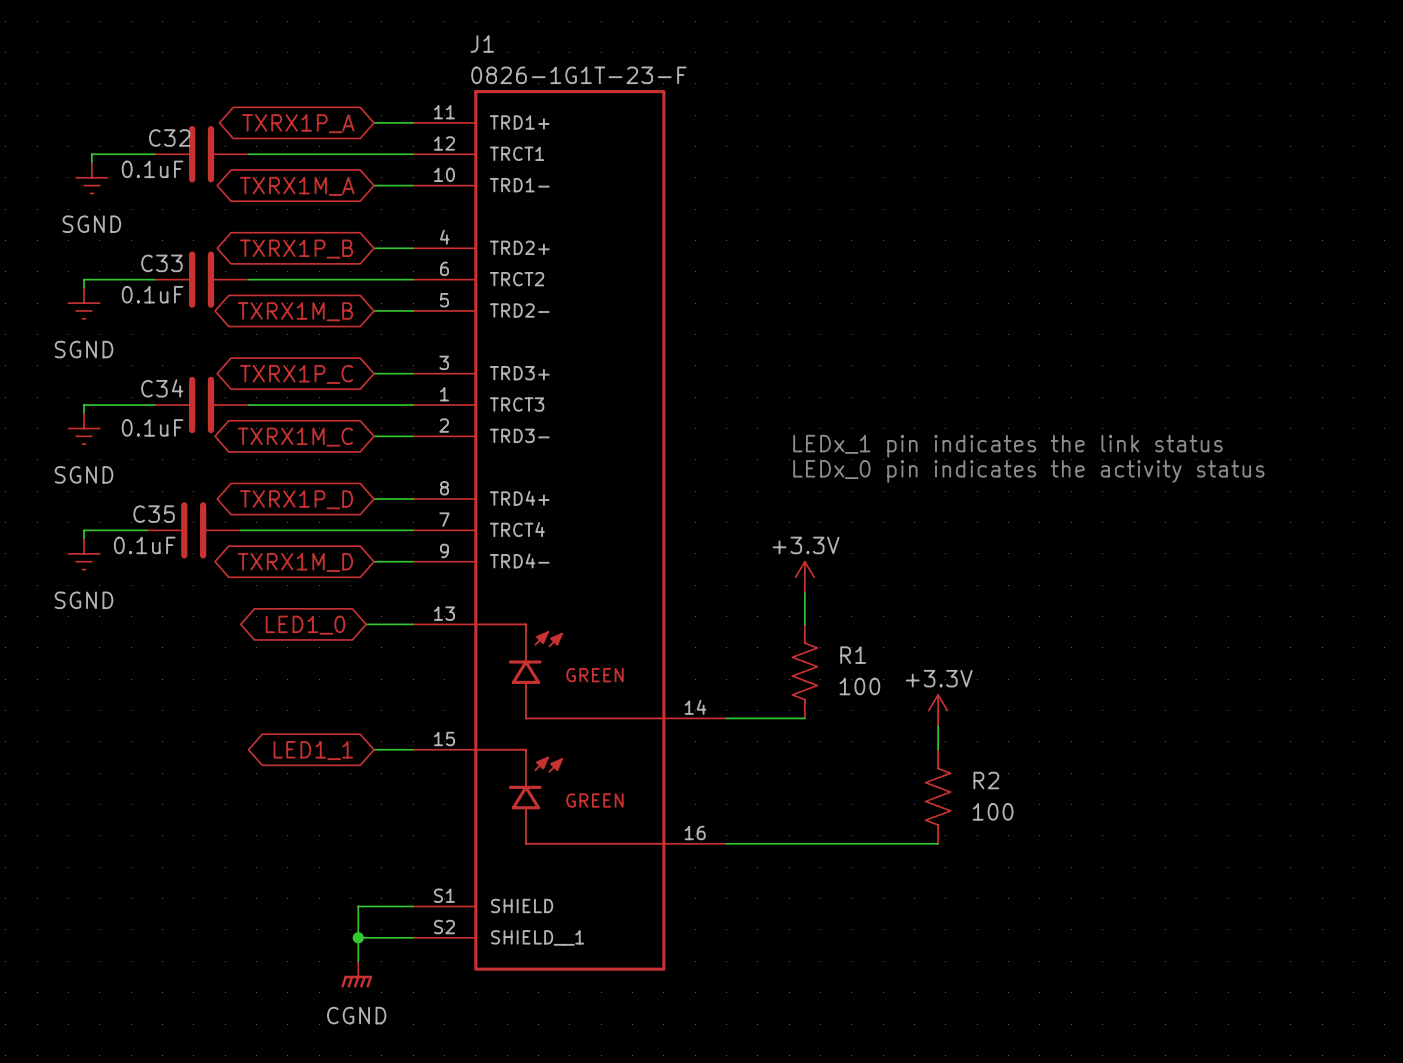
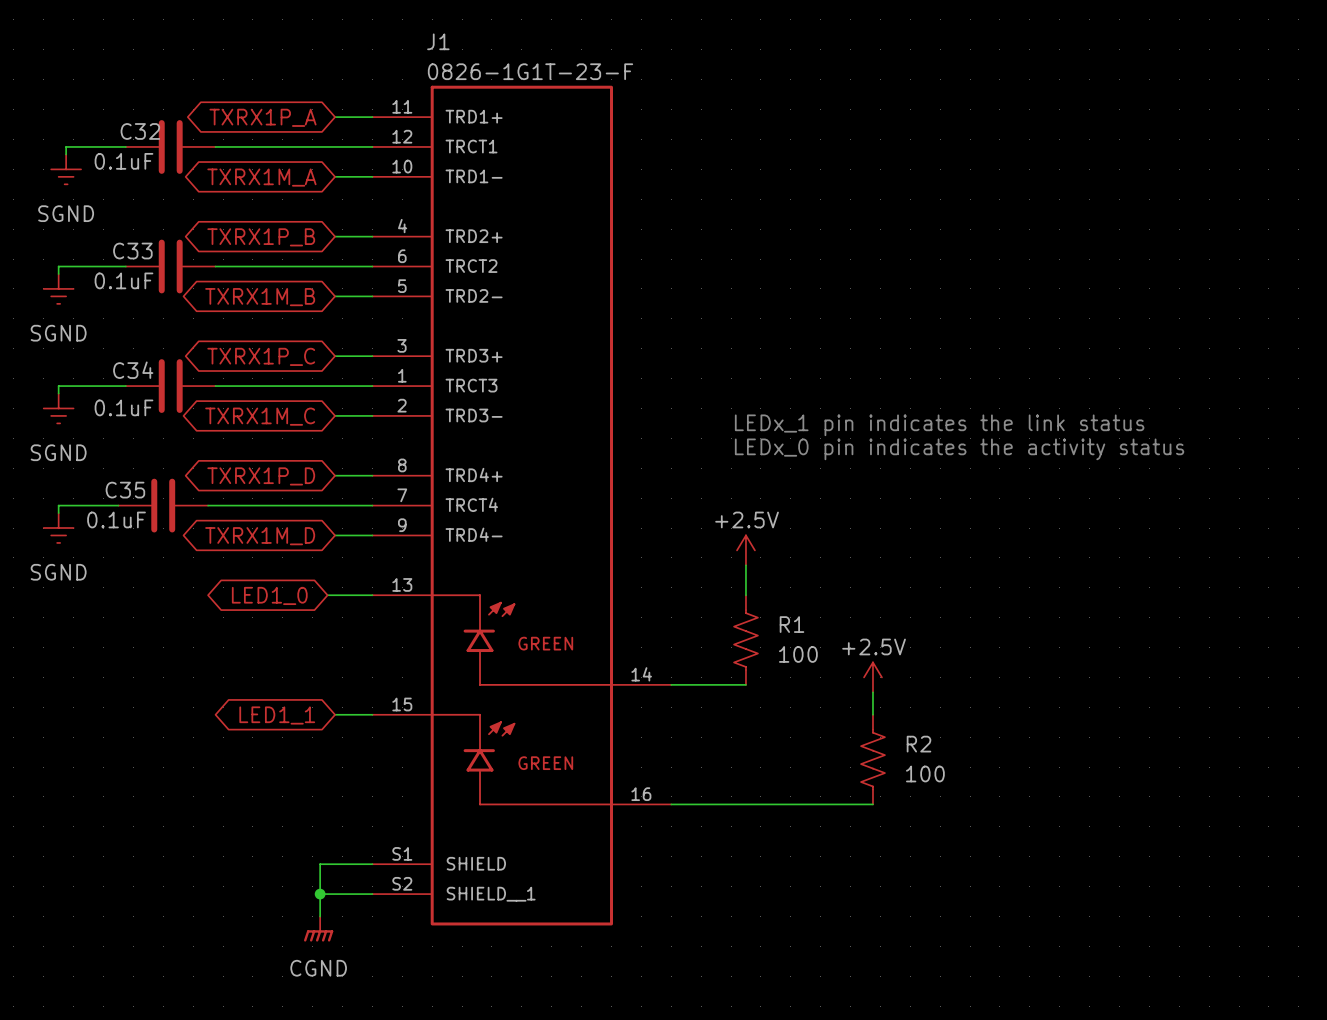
power symbol: +3.3V (804, 577) -> +2.5V (745, 550)
power symbol: +3.3V (938, 710) -> +2.5V (872, 677)

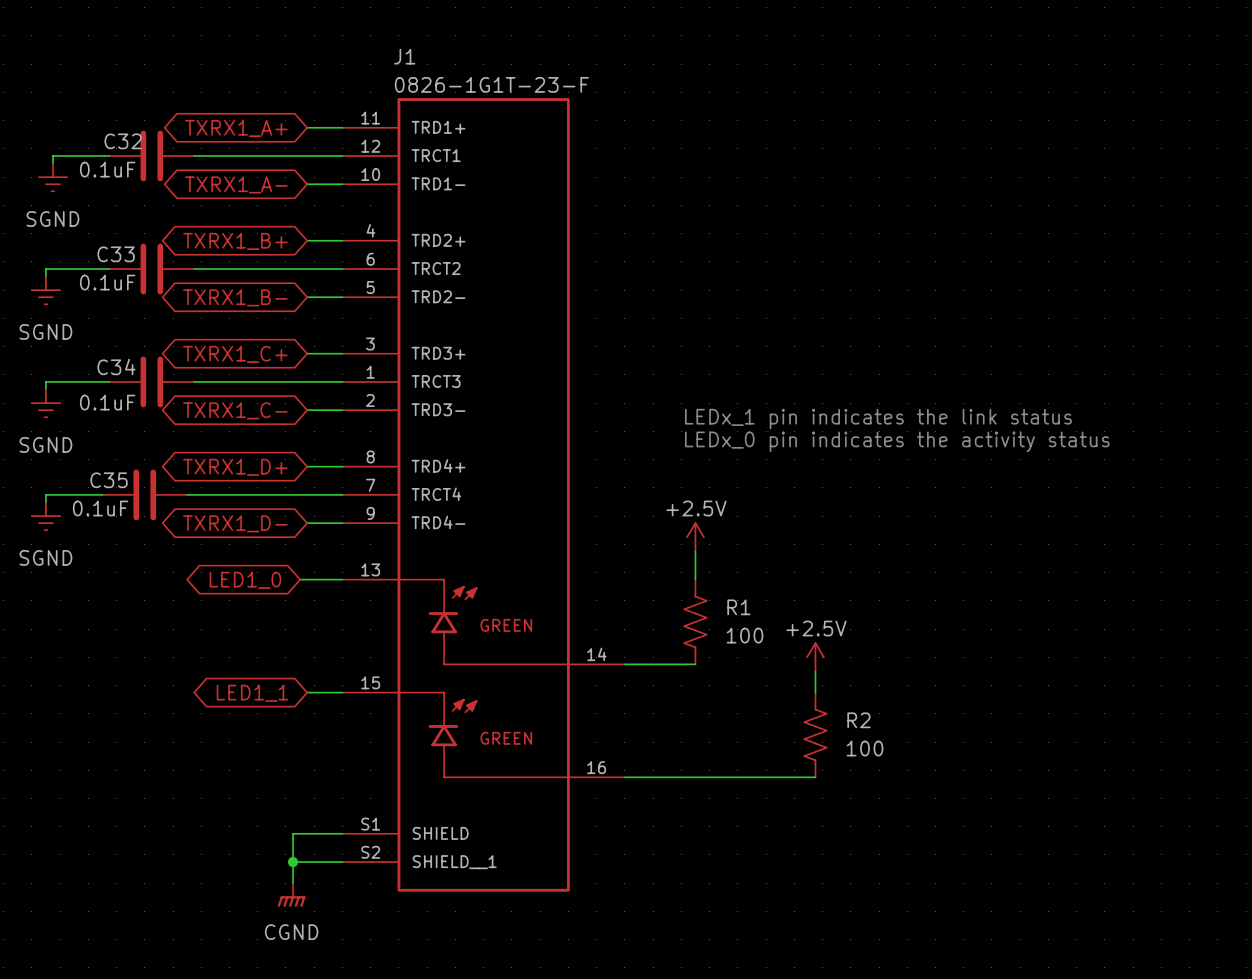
global label: TXRX1P_A (263, 117) -> TXRX1_A+ (236, 128)
global label: TXRX1M_A (261, 177) -> TXRX1_A- (236, 184)
global label: TXRX1P_B (261, 237) -> TXRX1_B+ (235, 241)
global label: TXRX1M_B (260, 297) -> TXRX1_B- (235, 297)
global label: TXRX1P_C (261, 356) -> TXRX1_C+ (235, 354)
global label: TXRX1M_C (260, 416) -> TXRX1_C- (235, 410)
global label: TXRX1P_D (261, 476) -> TXRX1_D+ (235, 467)
global label: TXRX1M_D (260, 536) -> TXRX1_D- (235, 523)

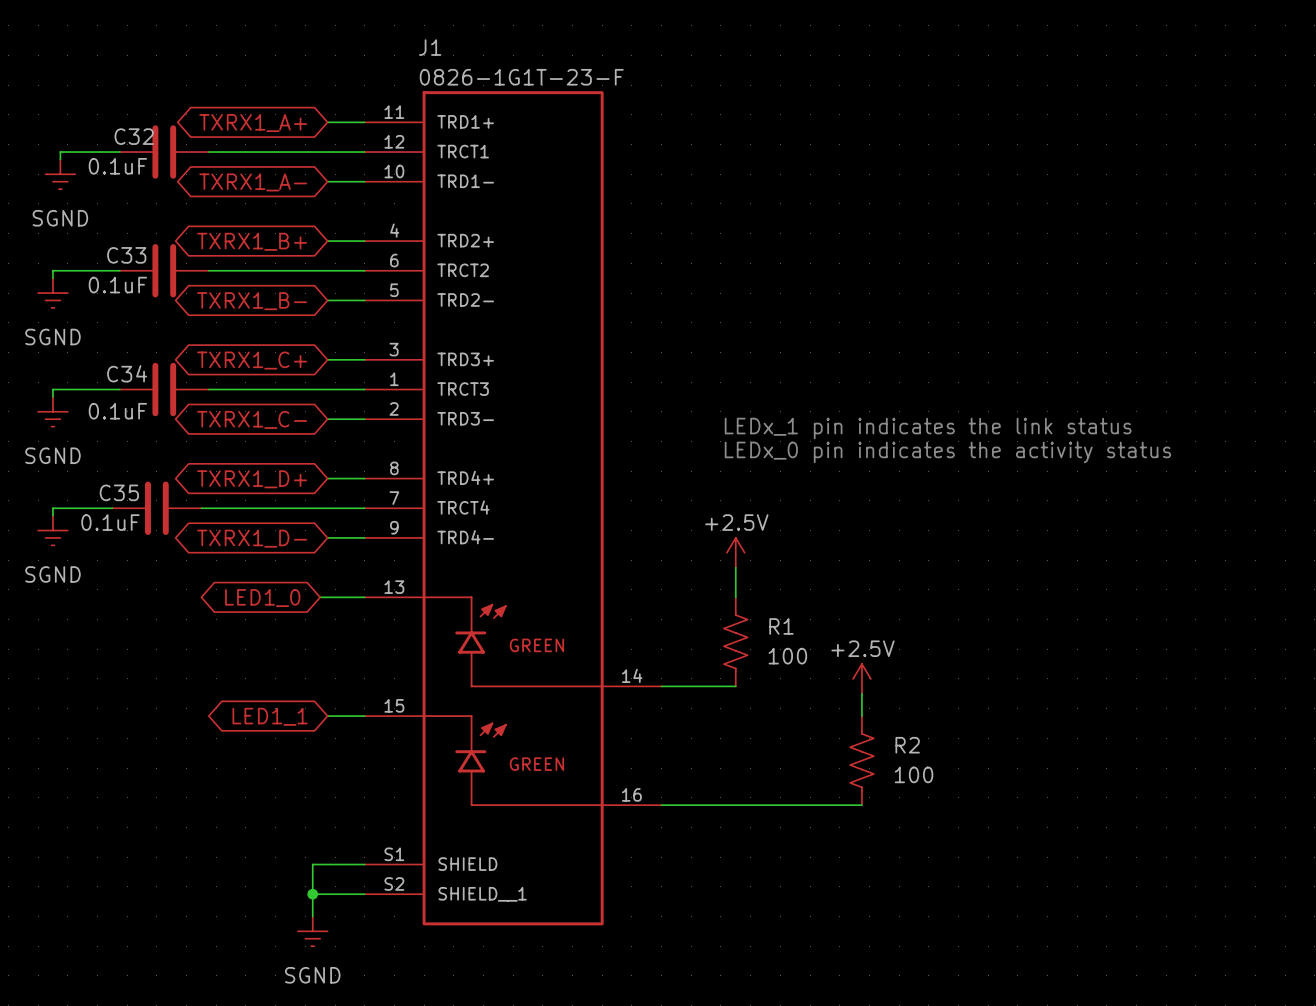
power symbol: CGND (291, 895) -> SGND (312, 931)

